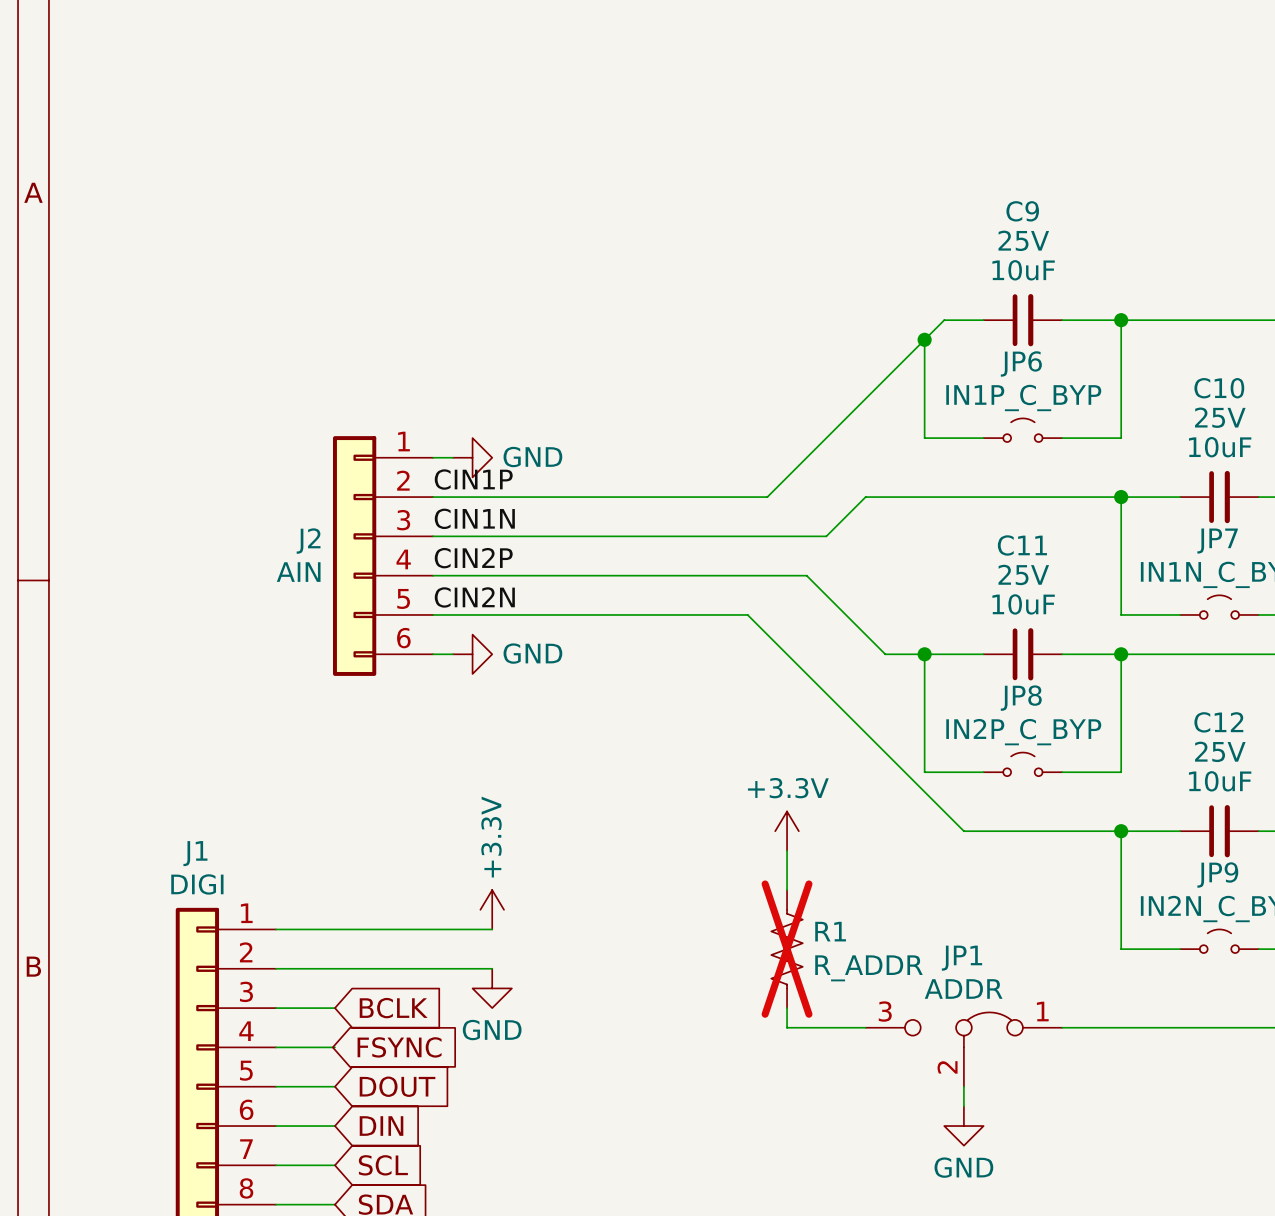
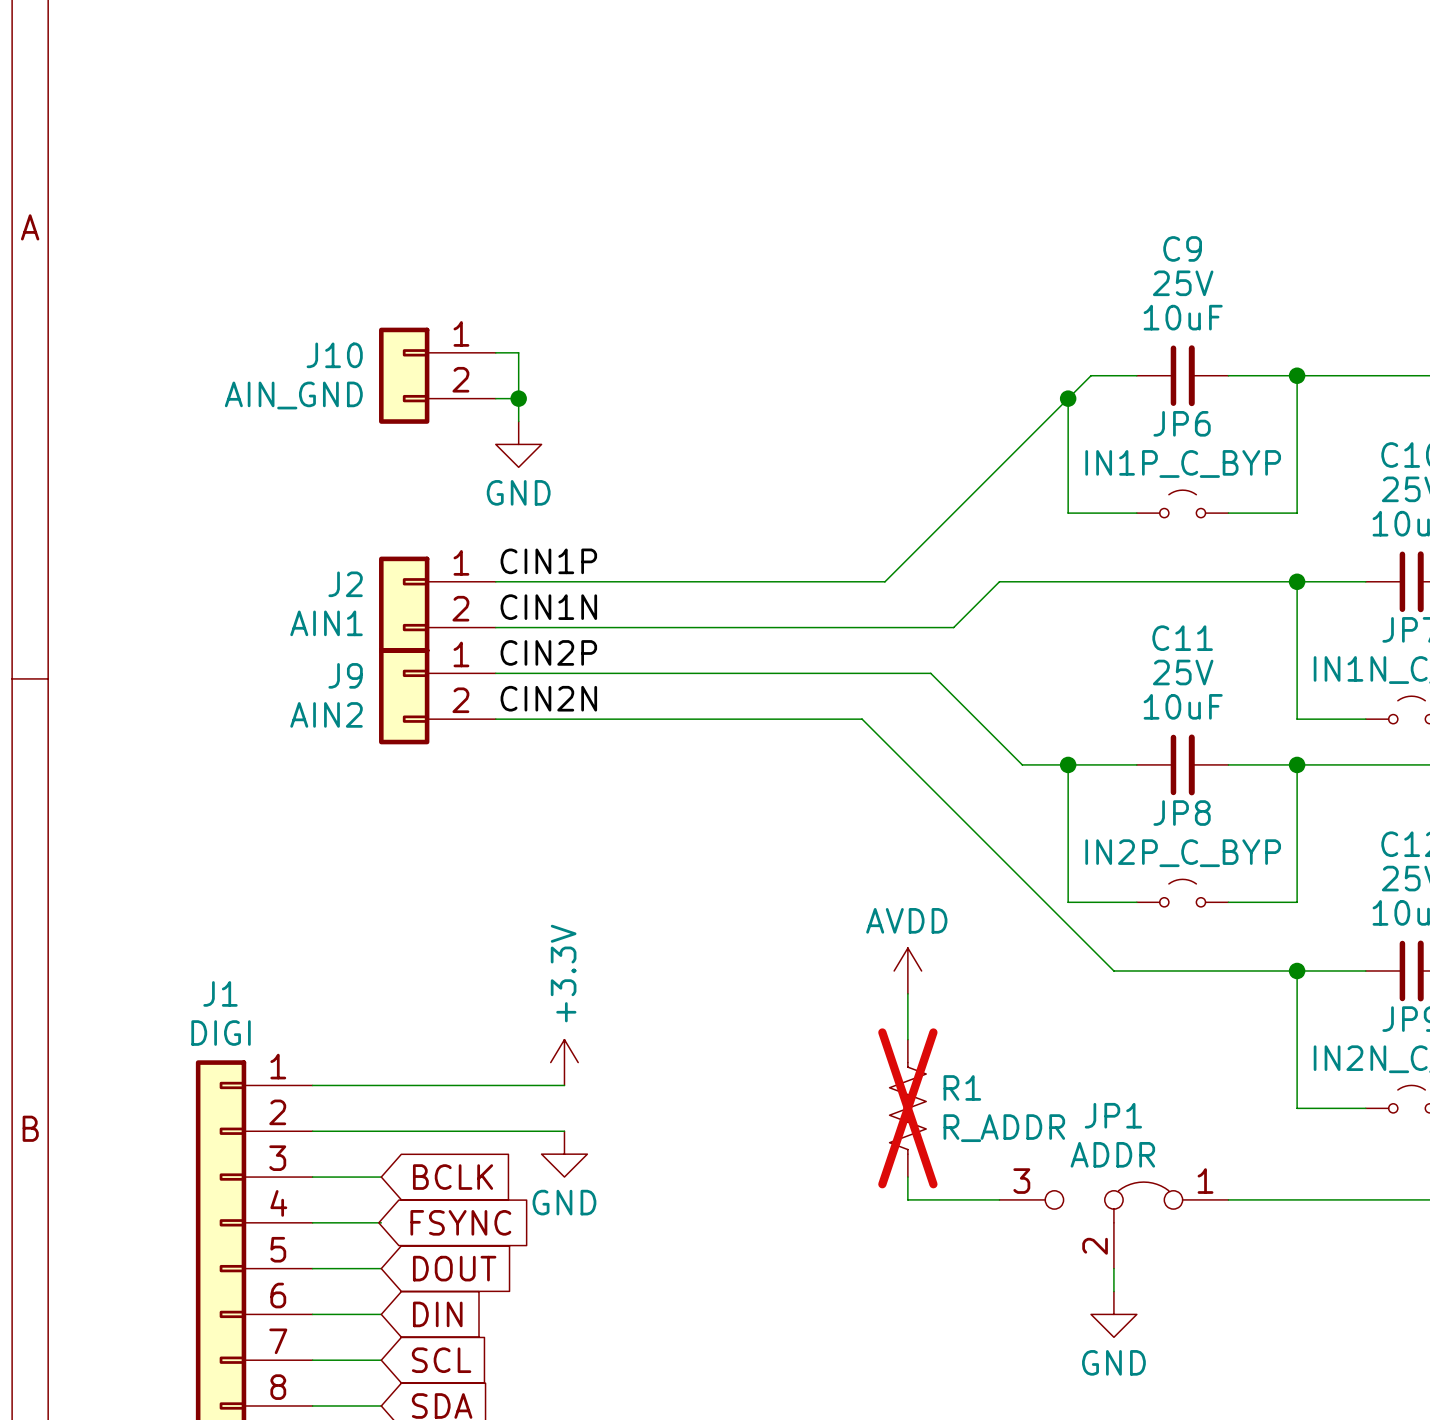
wire: none -> (495, 352) (518, 352) (518, 421)
J10: none -> AIN_GND (437, 375)
junction: none -> (518, 398)
J2 symbol: [333, 436, 434, 676] -> [379, 556, 496, 653]
wire: (433, 457) (452, 457) -> (495, 398) (518, 398)
power symbol rotation: 0° (472, 457) -> 90° clockwise (518, 444)
power symbol position: GND (472, 457) -> GND (518, 444)
J2 value: AIN (298, 572) -> AIN1 (326, 623)
J9: none -> AIN2 (437, 696)
wire: (433, 654) (452, 654) -> none
power symbol: GND (472, 654) -> none
power symbol: +3.3V (787, 831) -> AVDD (907, 970)

